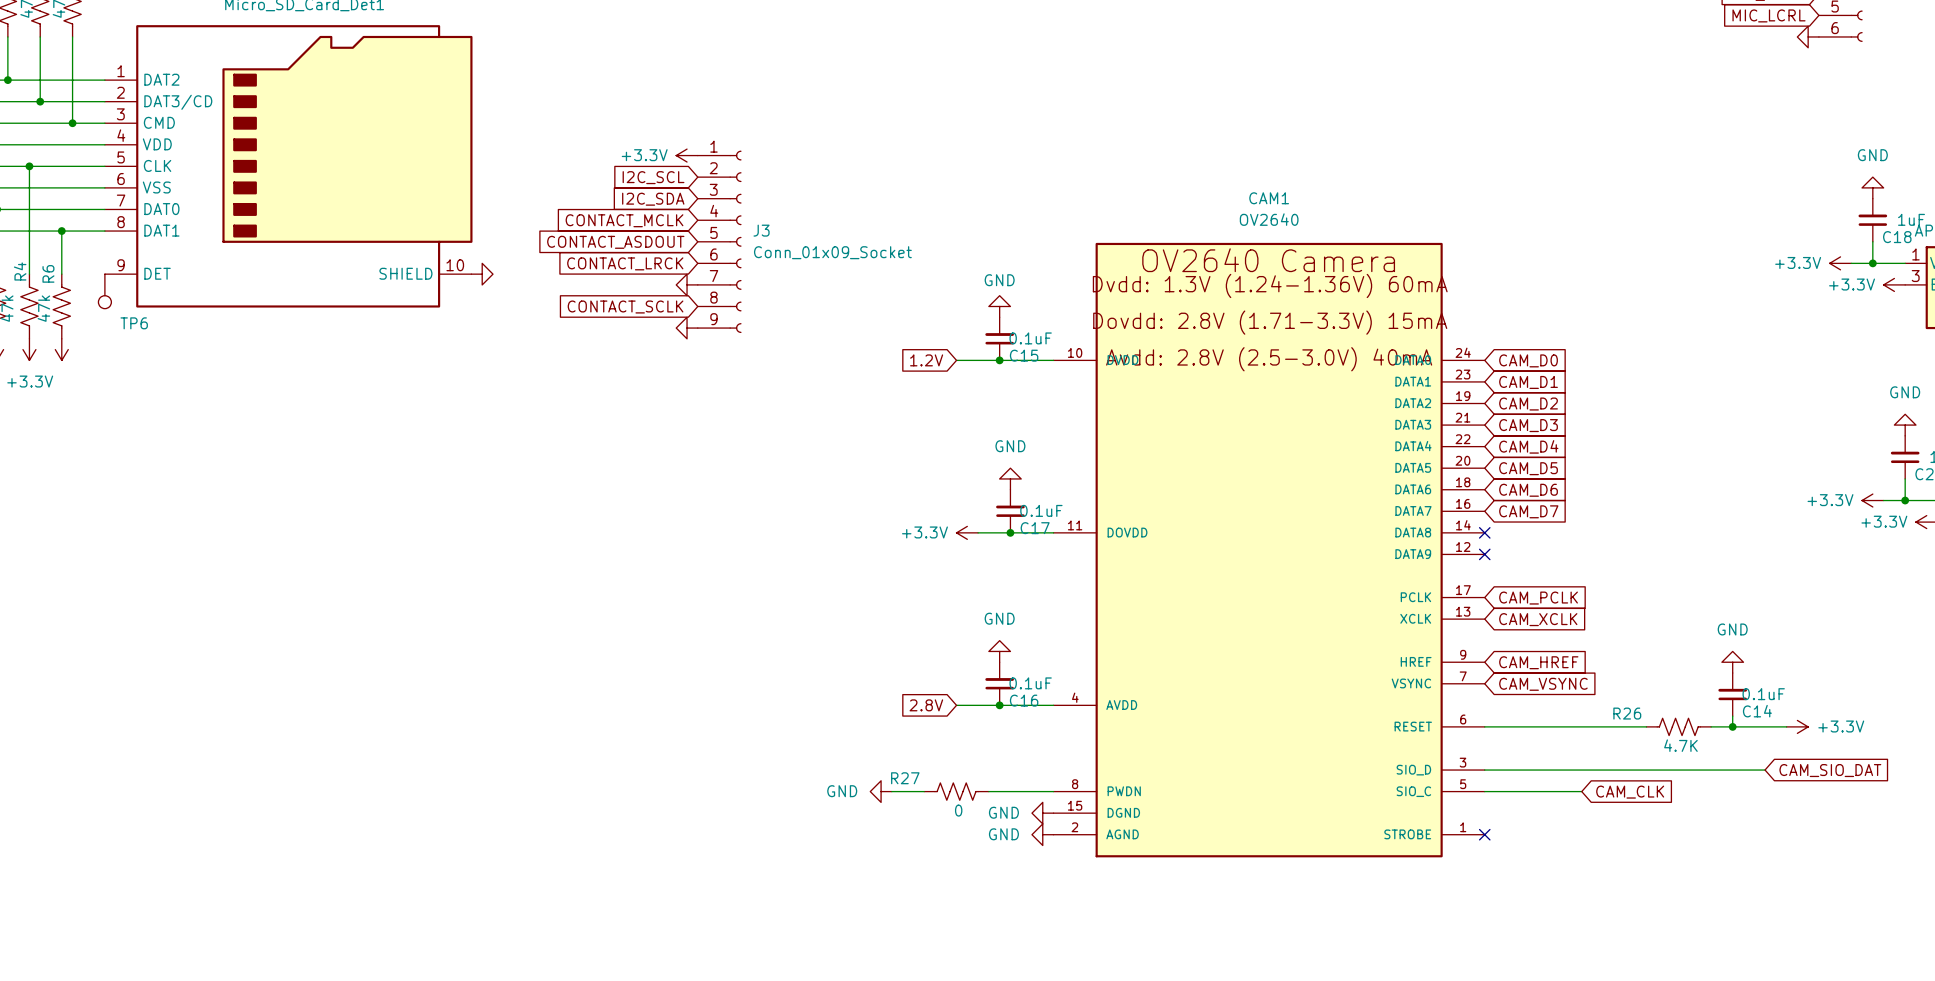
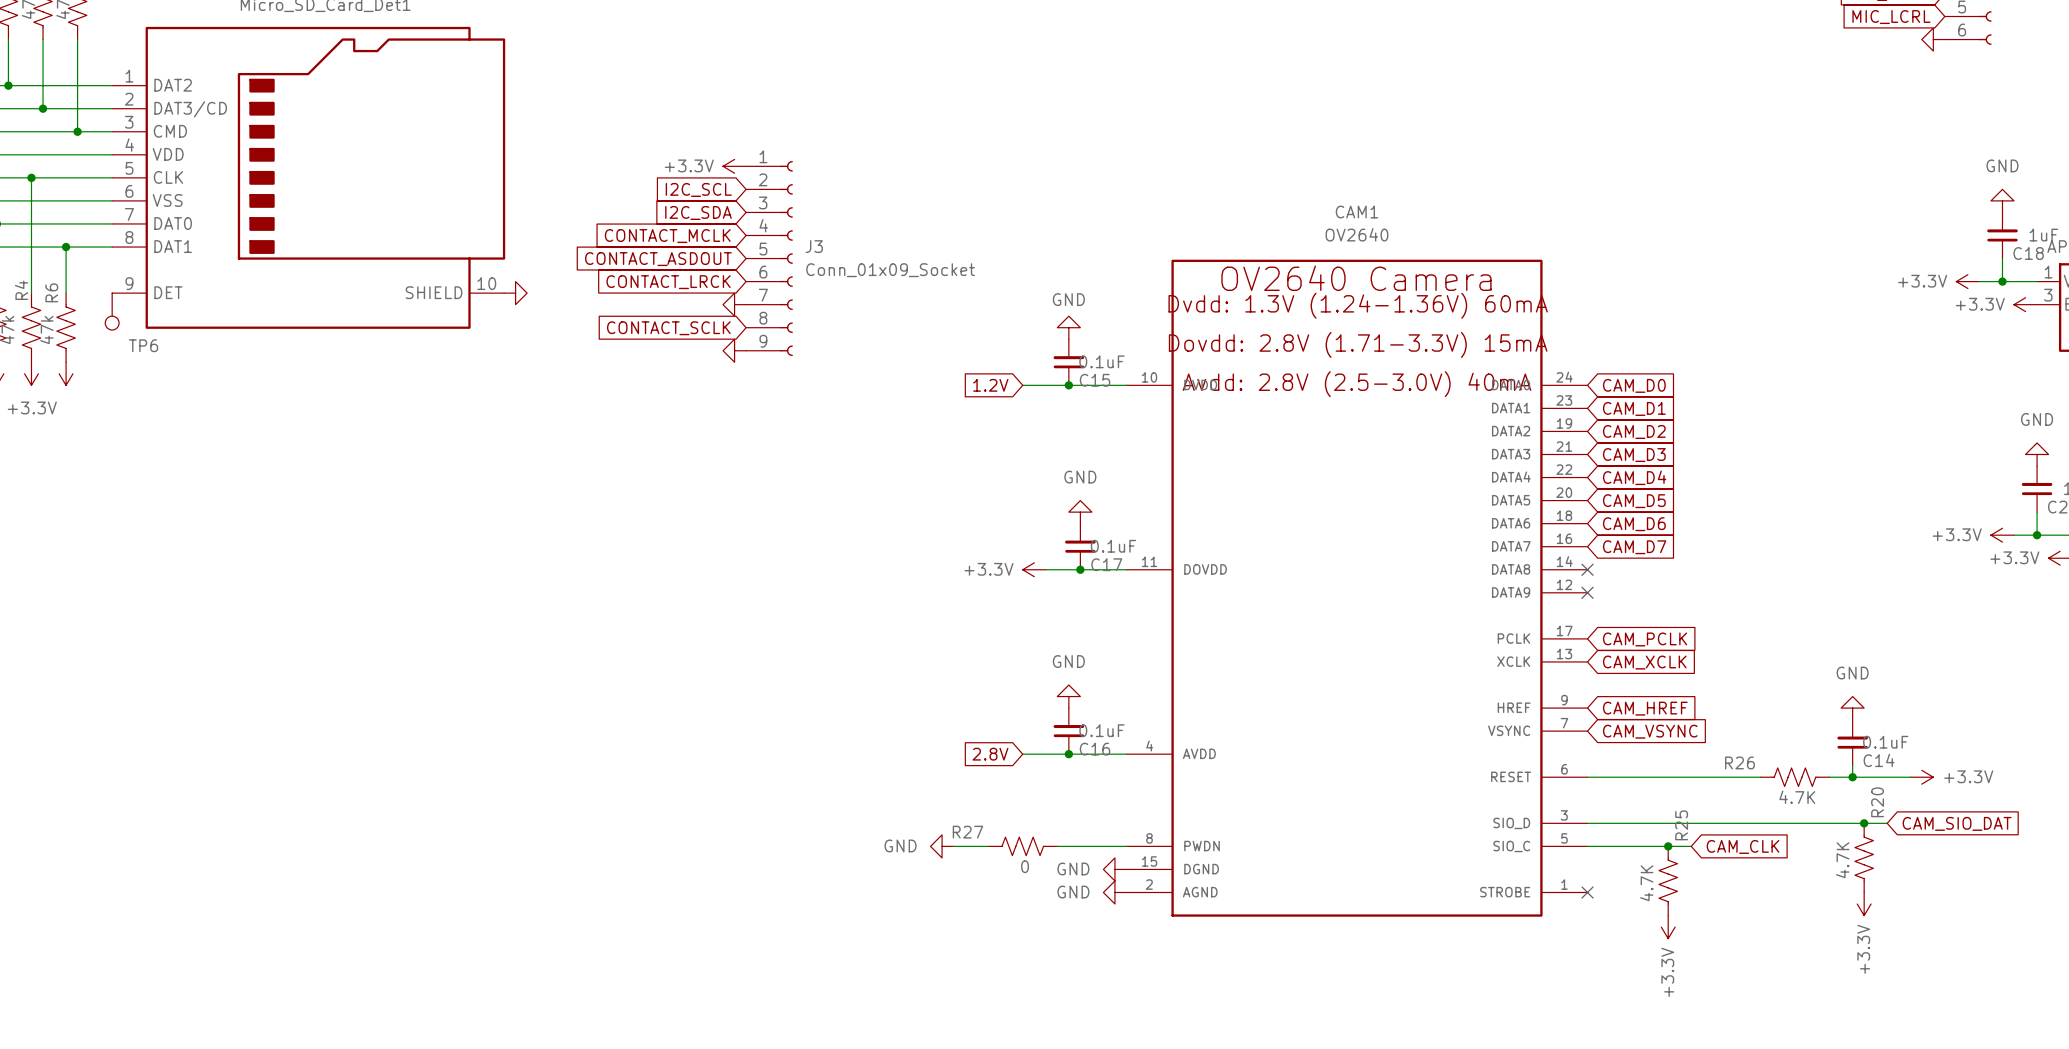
junction: none -> (1864, 823)
junction: none -> (1668, 846)
R20: none -> 4.7K (1864, 857)
R25: none -> 4.7K (1668, 880)
power symbol: none -> +3.3V (1864, 904)
power symbol: none -> +3.3V (1668, 927)

